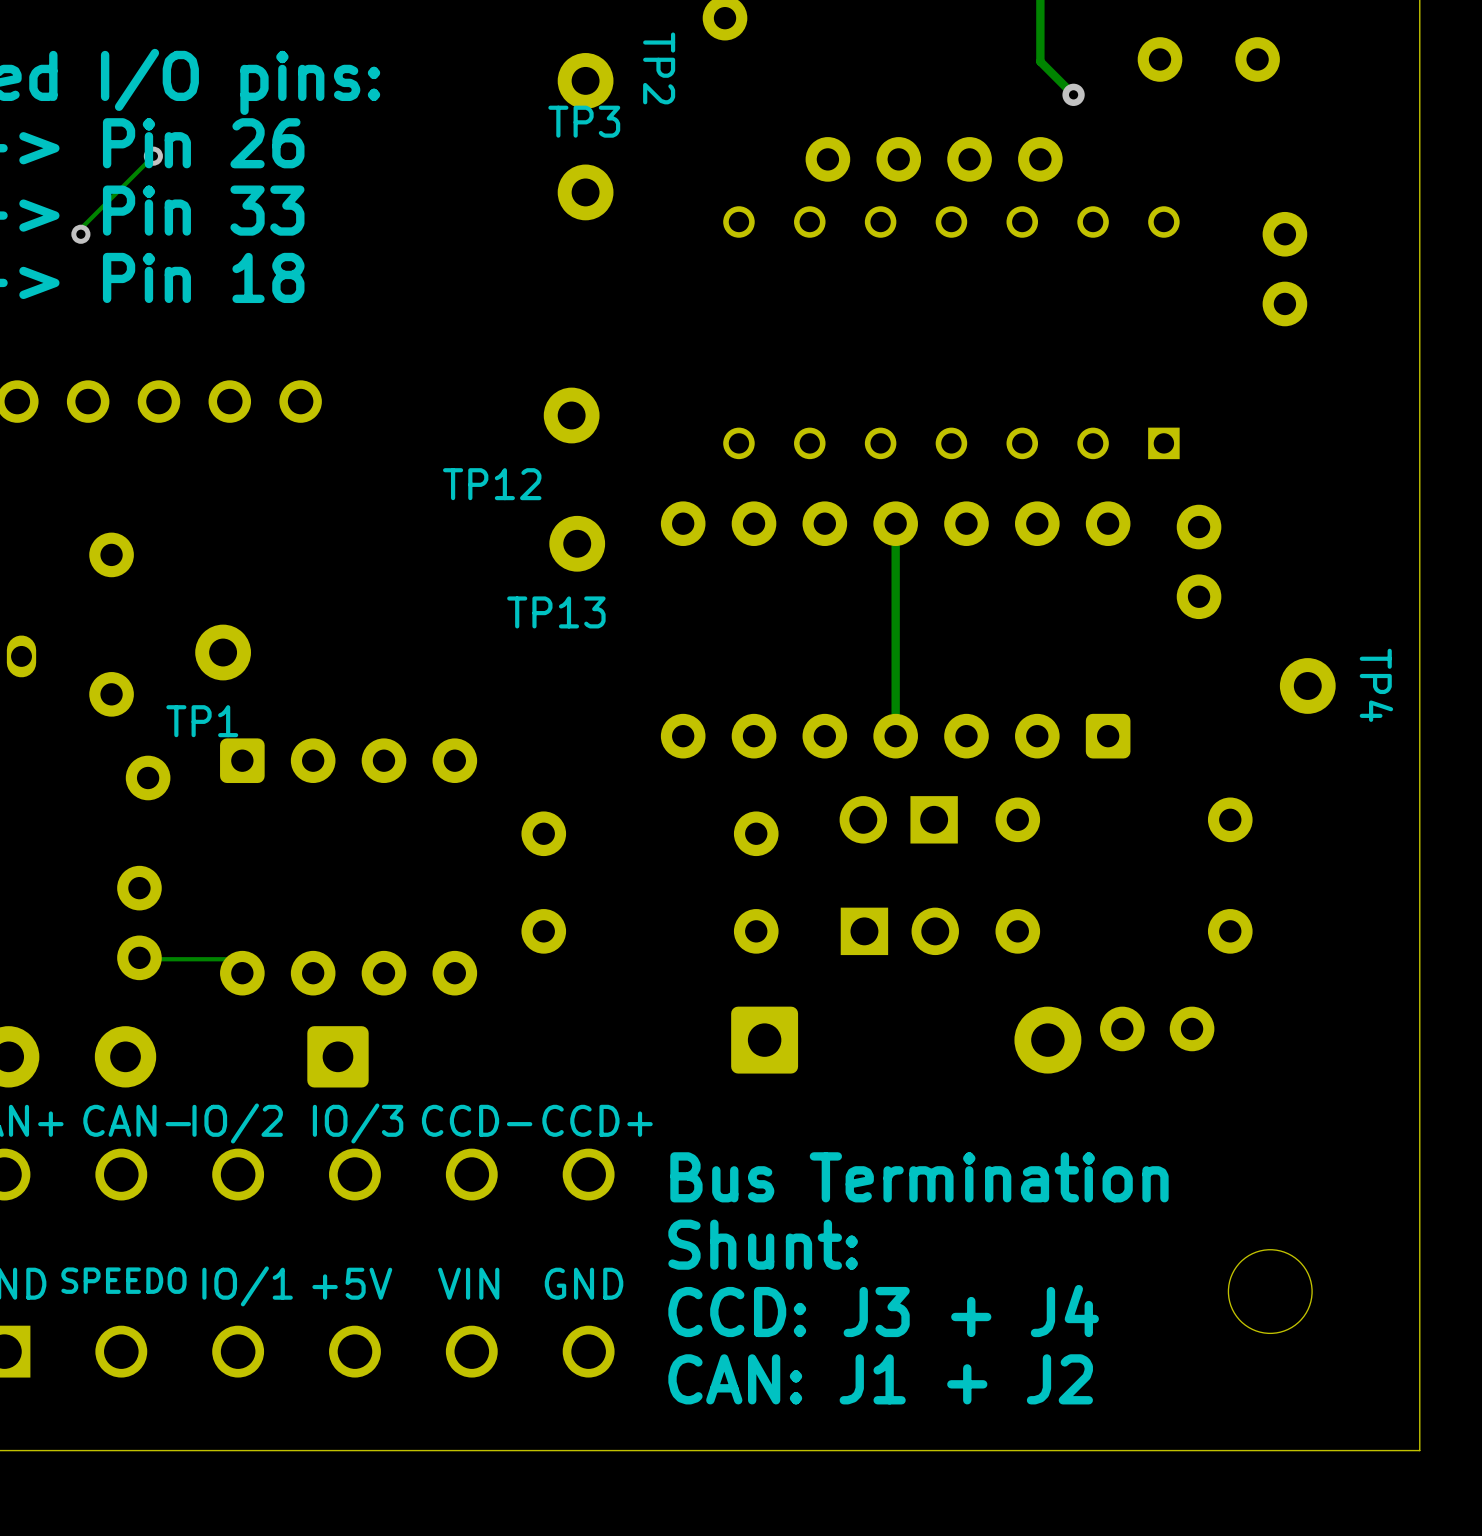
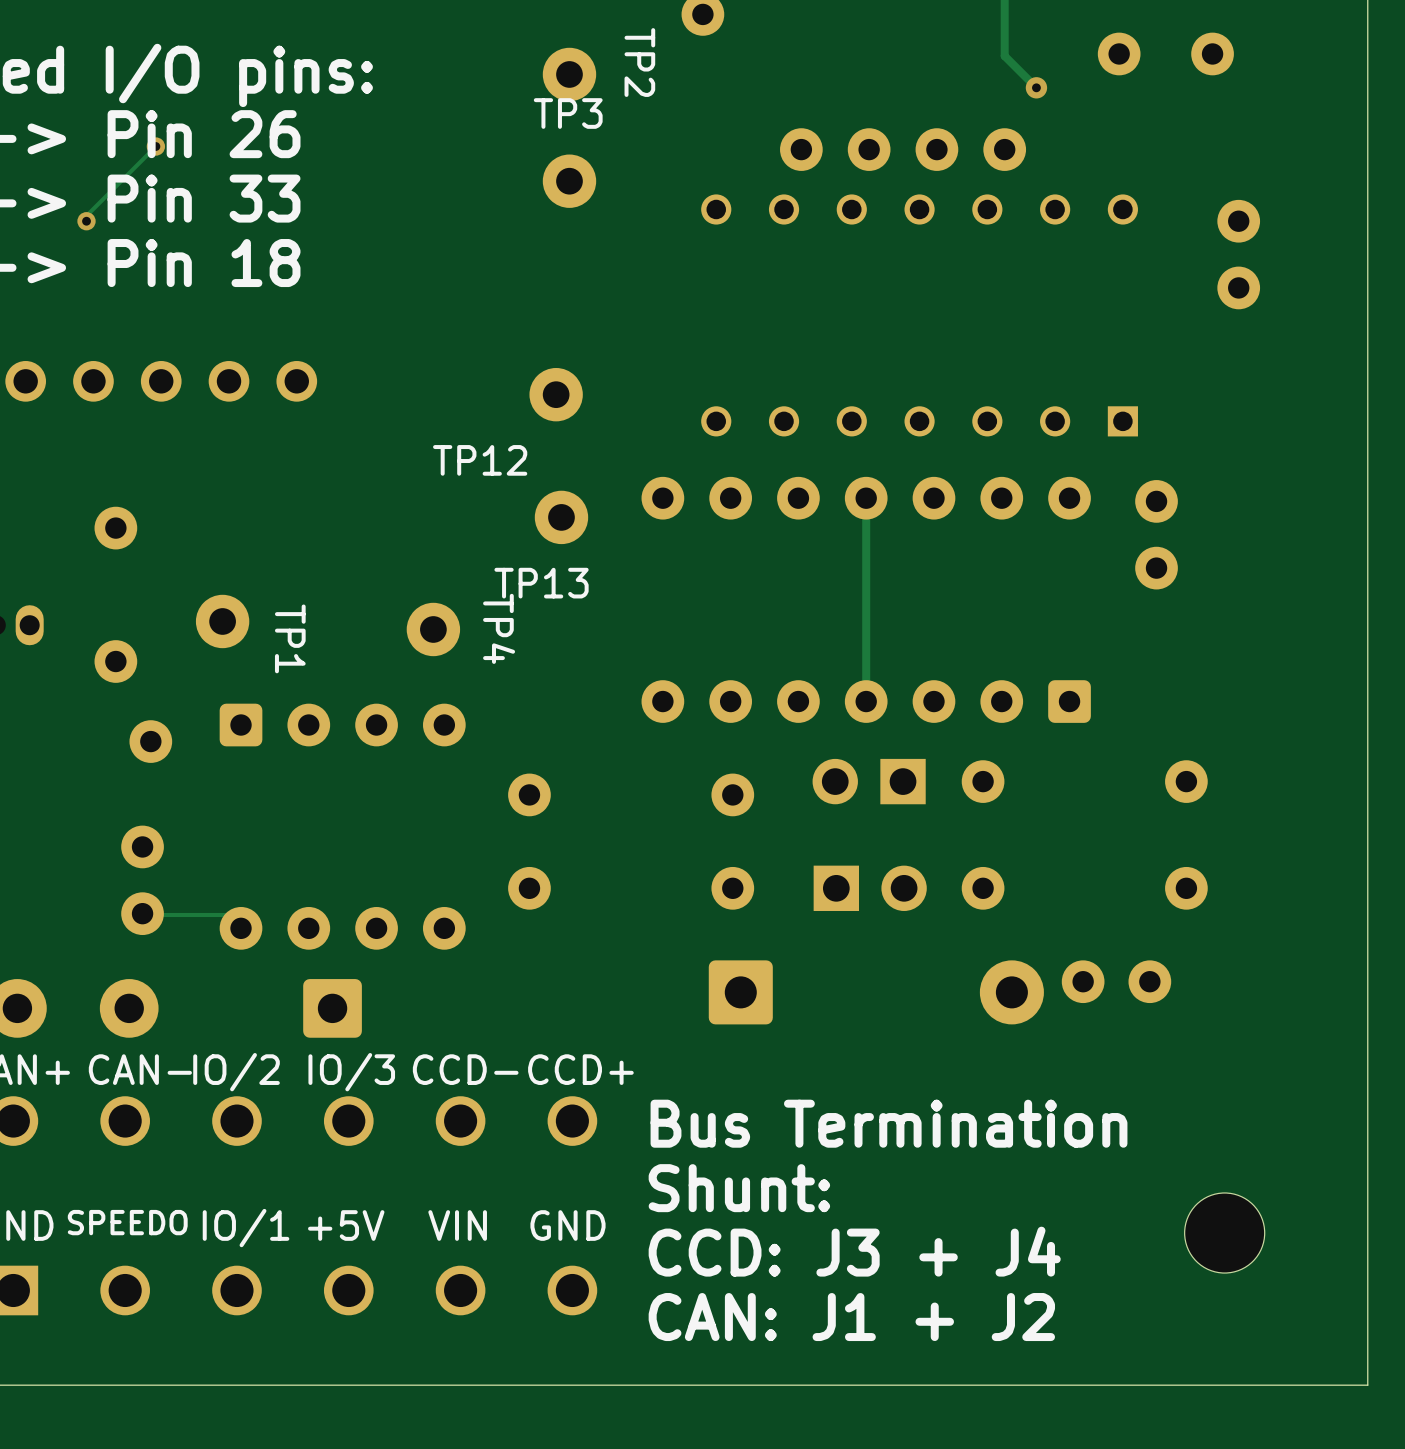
TP4 position: (1307, 685) -> (433, 629)
TP1 name rotation: 0° (202, 721) -> 90° clockwise (290, 638)
TP1 name position: TP1 (202, 721) -> TP1 (290, 638)

